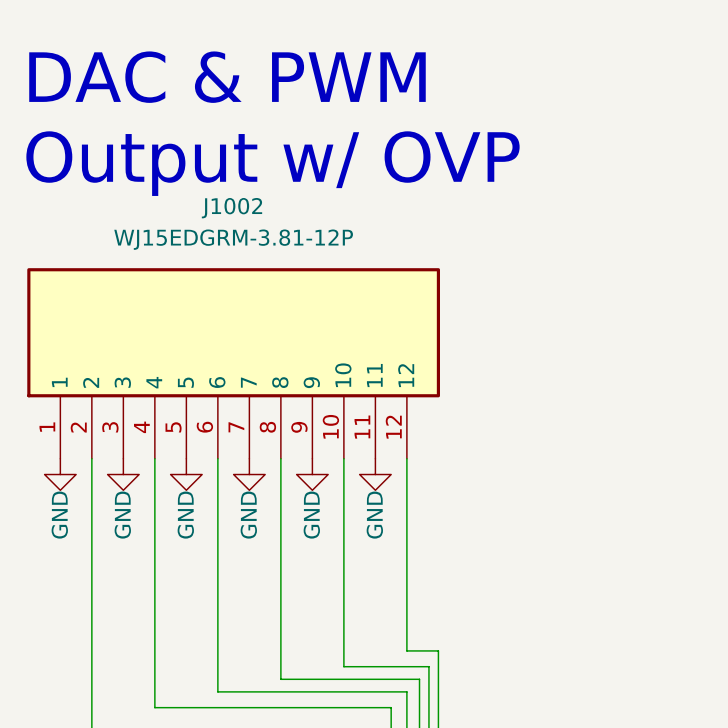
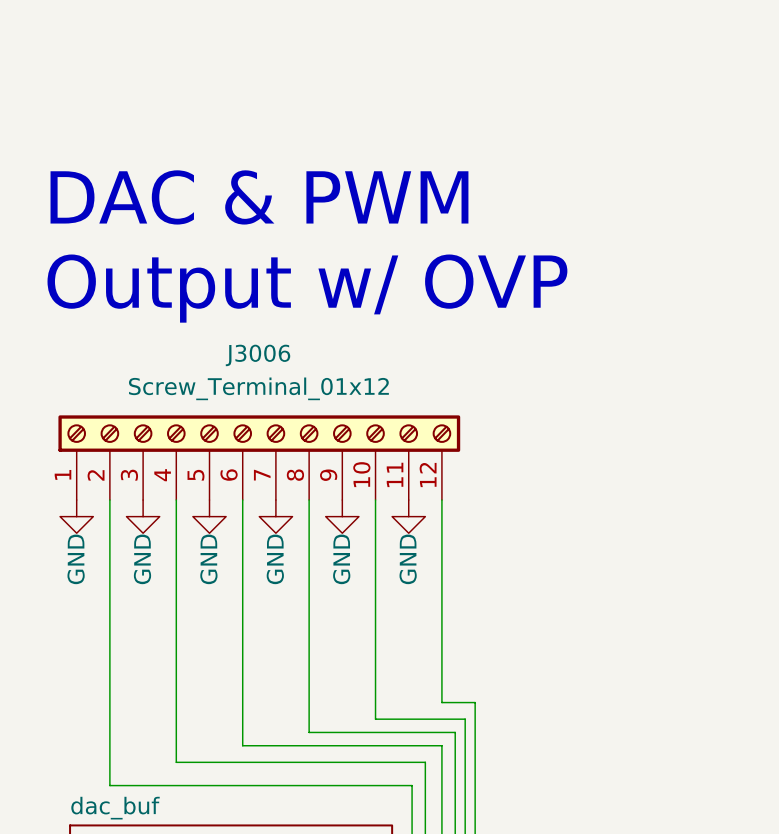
text position: DAC & PWM (227, 77) -> DAC & PWM (259, 197)
text position: Output w/ OVP (272, 163) -> Output w/ OVP (307, 288)
J1002: WJ15EDGRM-3.81-12P (233, 363) -> none
J3006: none -> Screw_Terminal_01x12 (259, 457)

